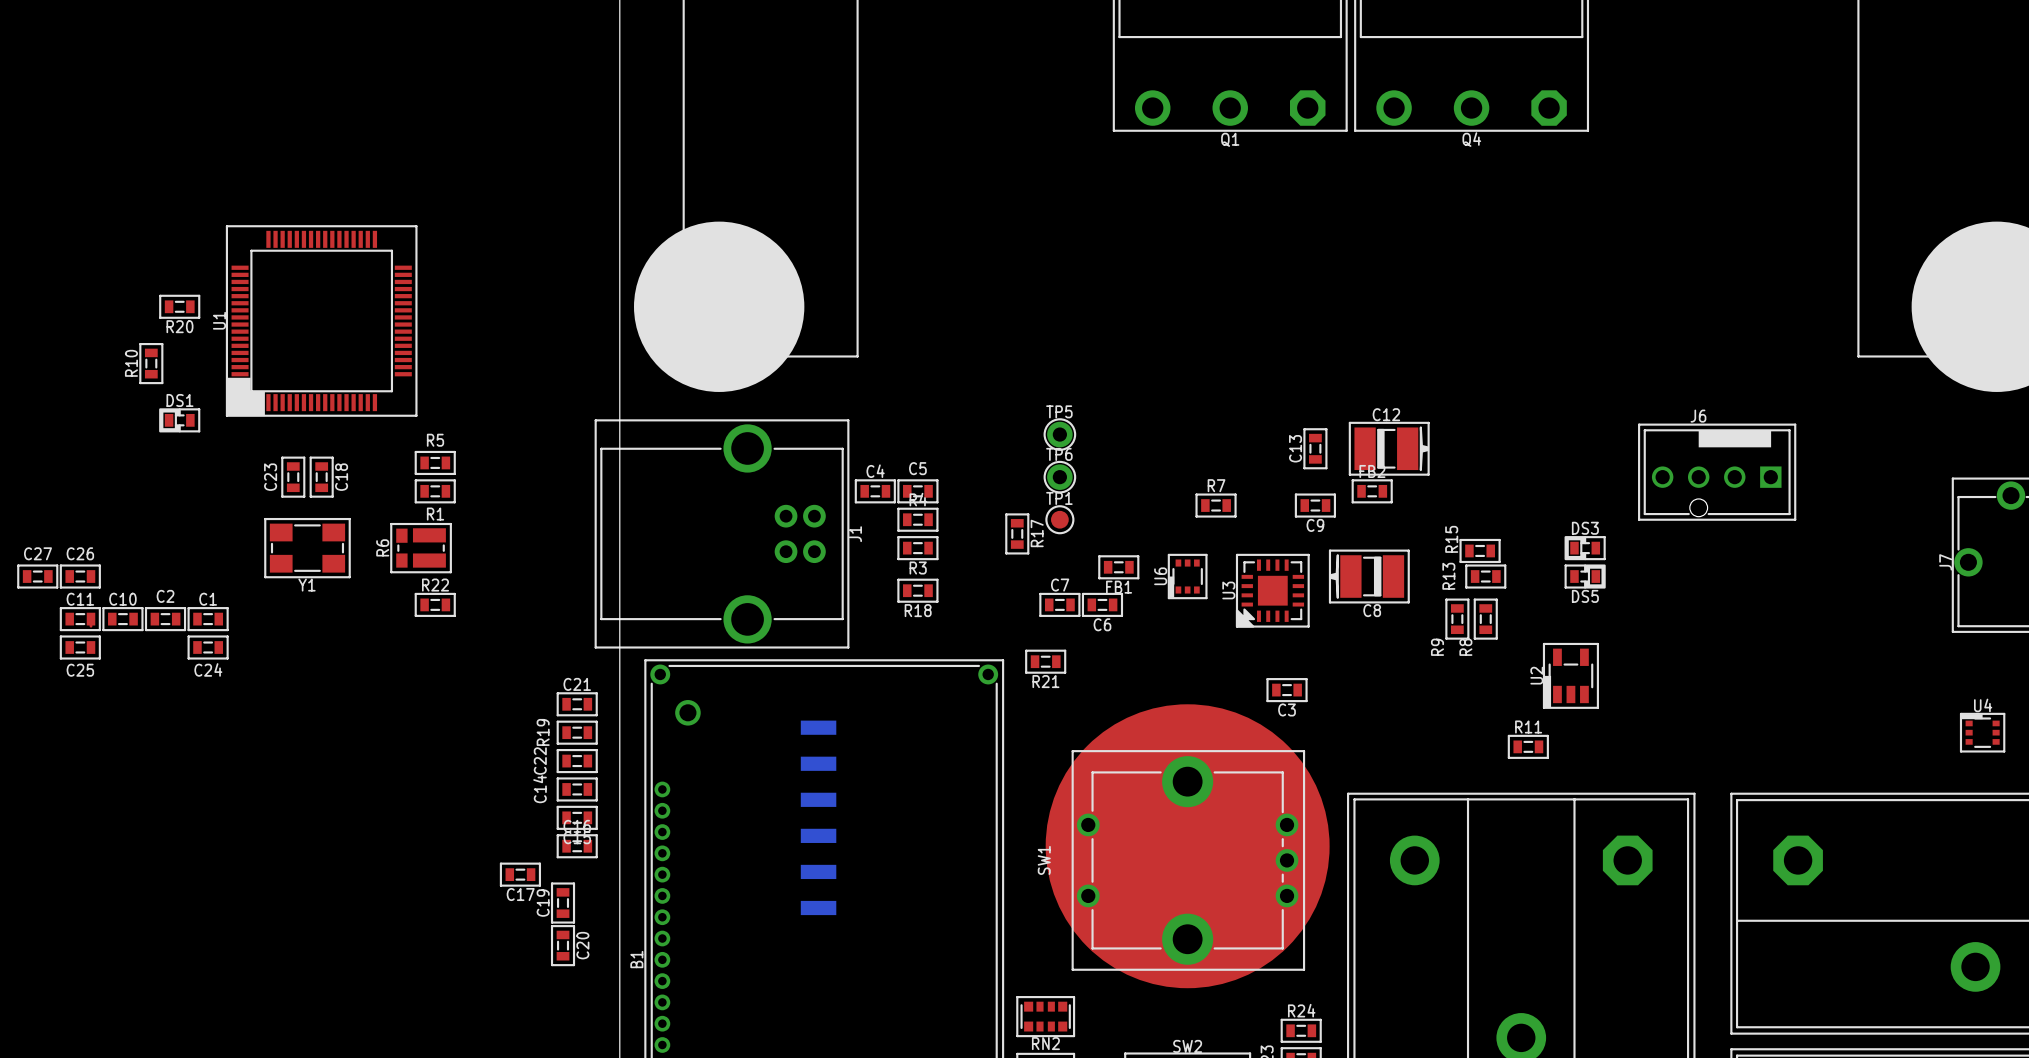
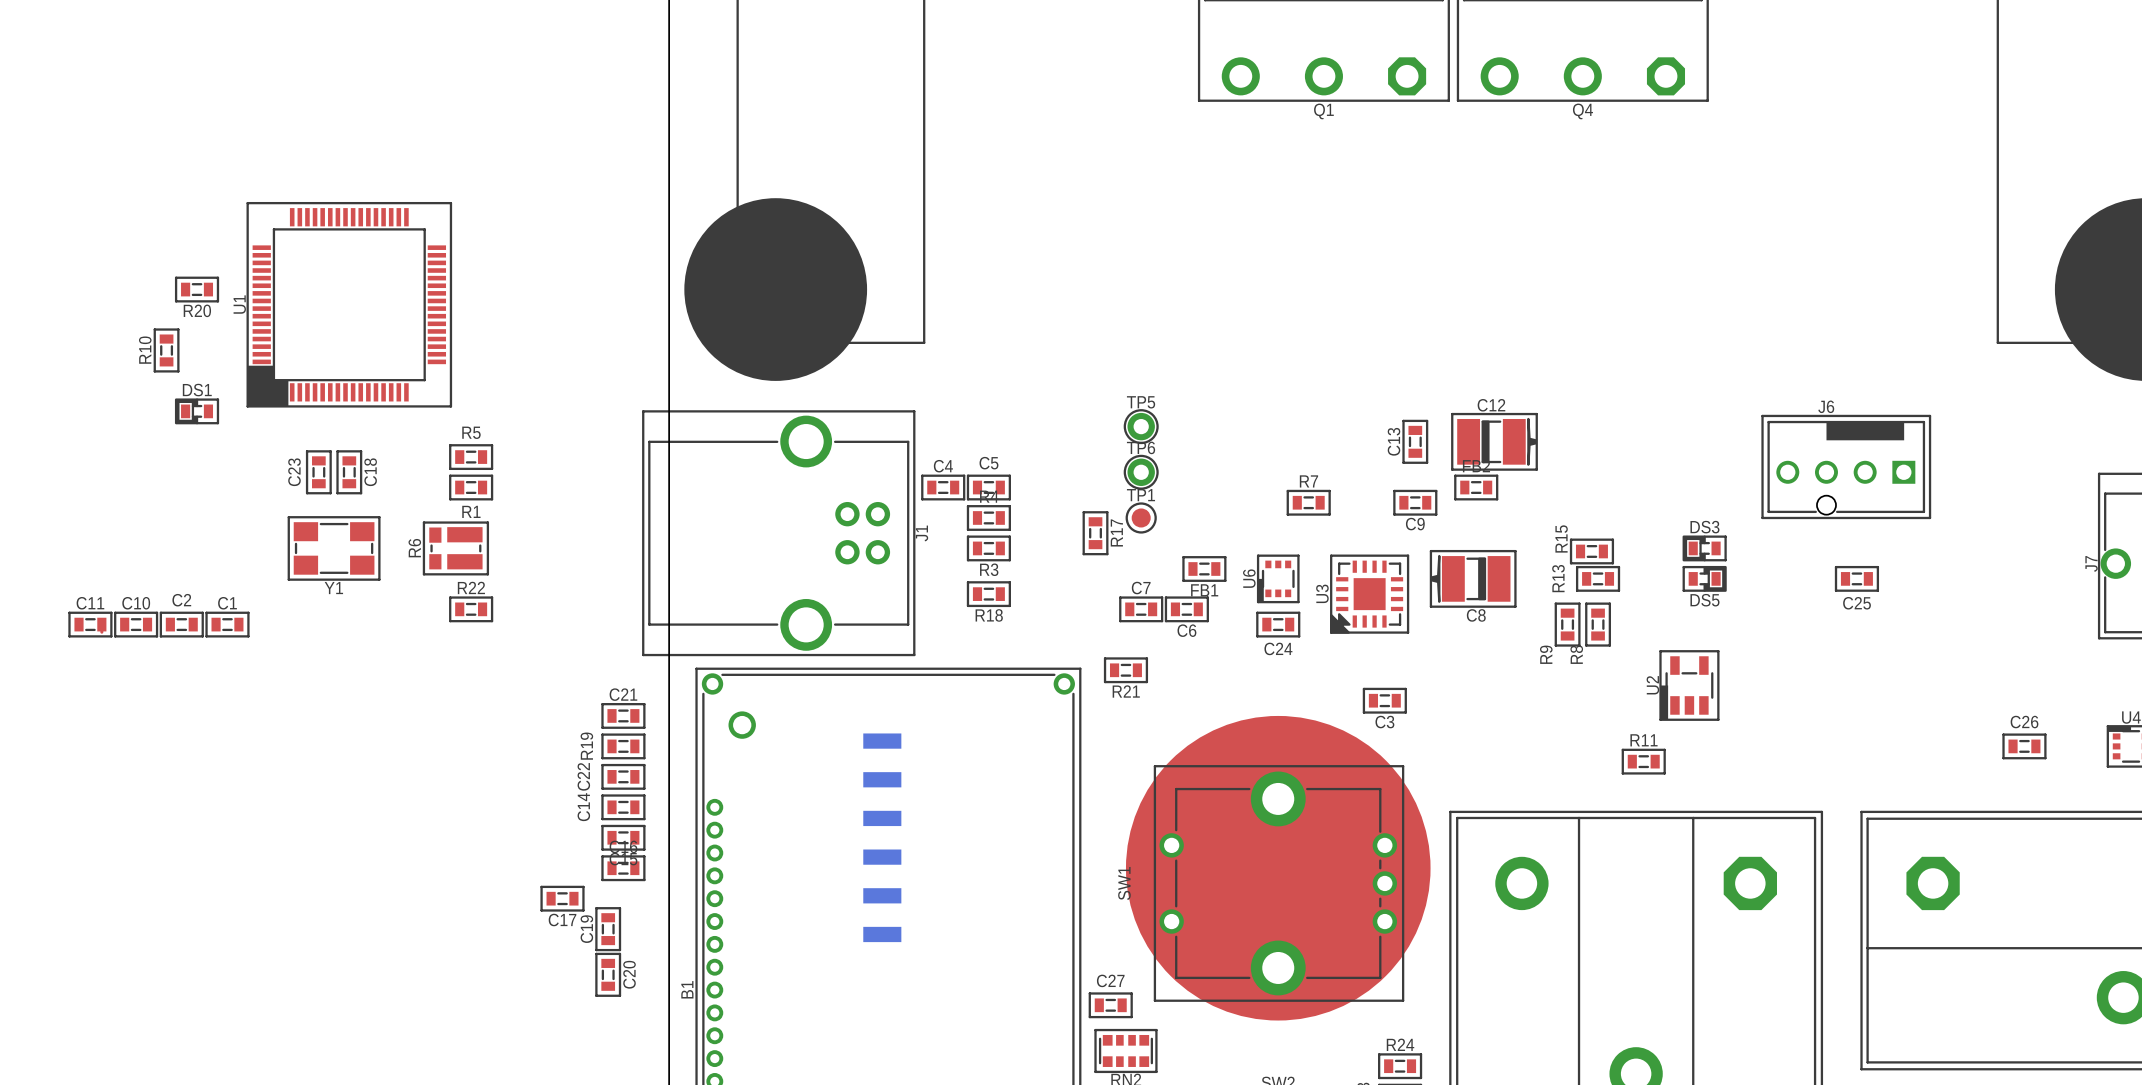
C27 position: (37, 576) -> (1110, 1005)
C26 position: (80, 576) -> (2024, 746)
C25 position: (80, 647) -> (1856, 578)
C24 position: (208, 647) -> (1278, 624)

